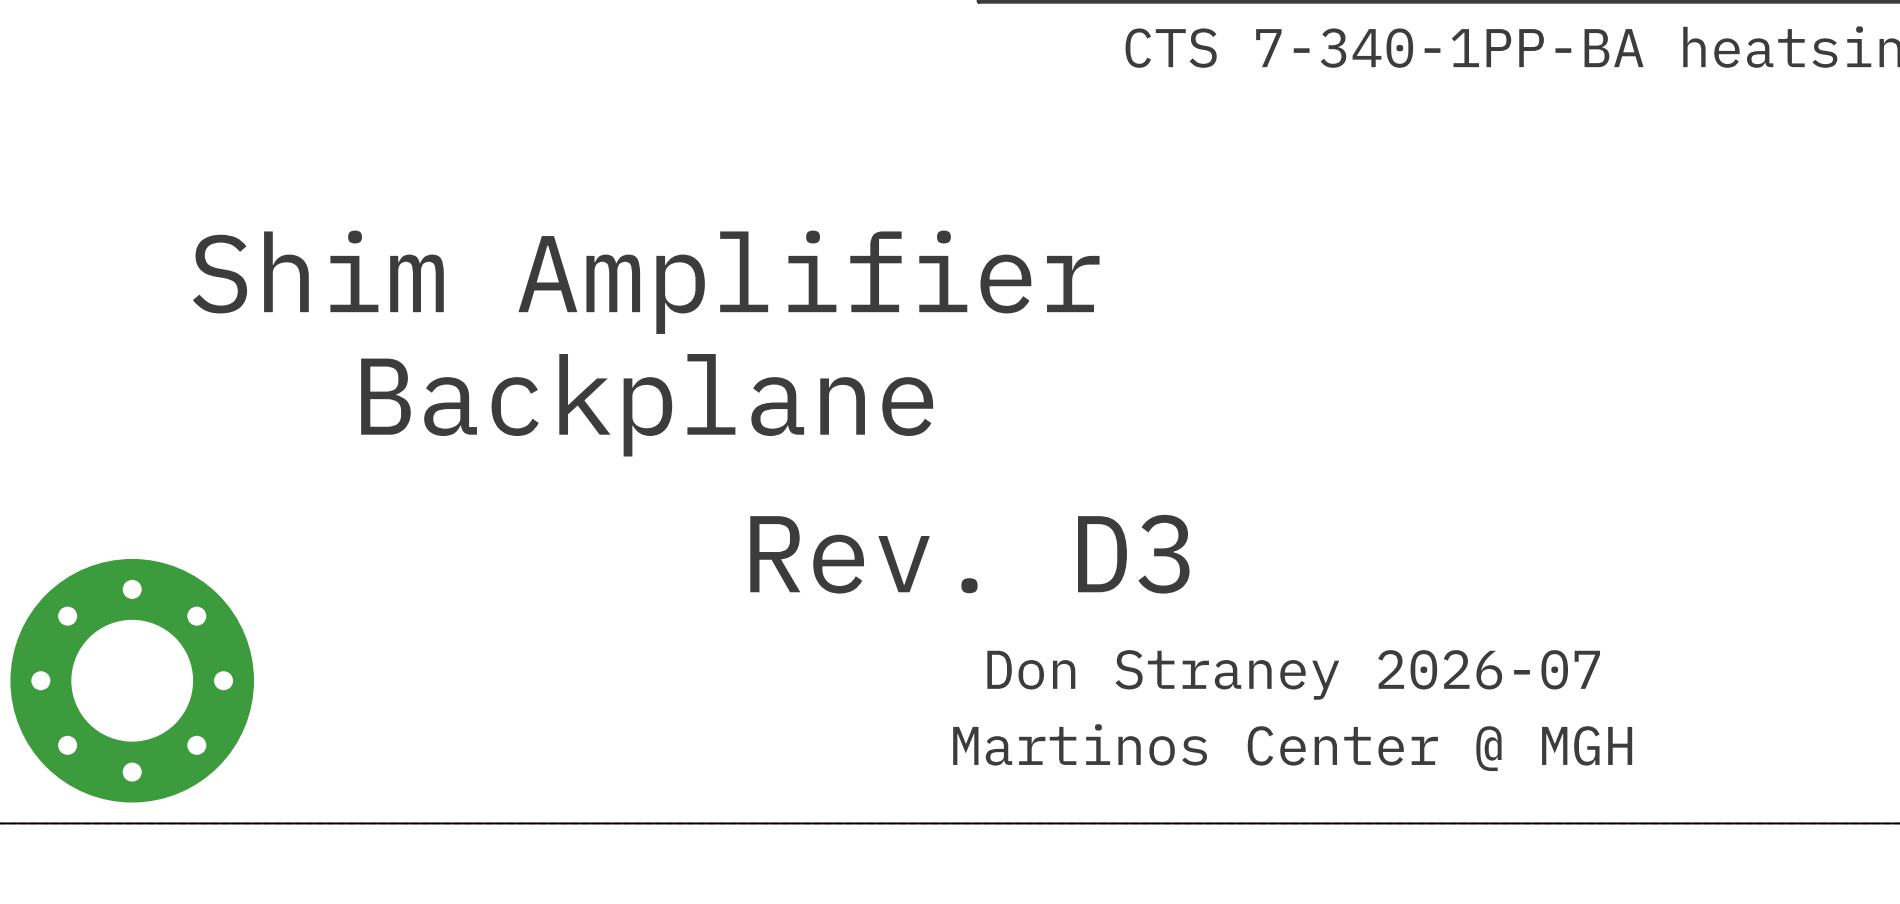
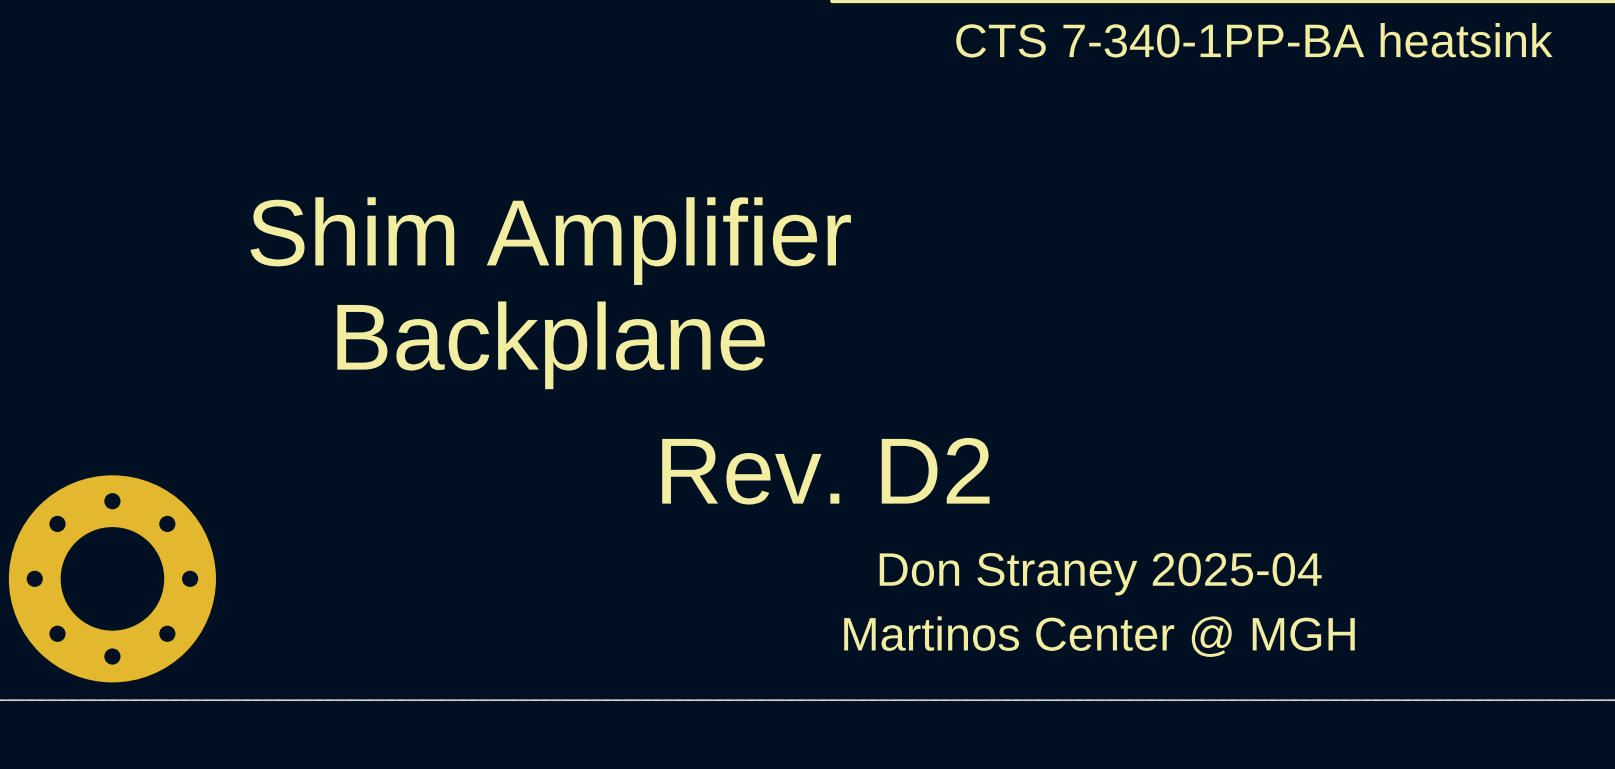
text: Rev. D3 (969, 554) -> Rev. D2 (825, 471)
text: Don Straney 2026-07 (1293, 674) -> Don Straney 2025-04 (1100, 574)

